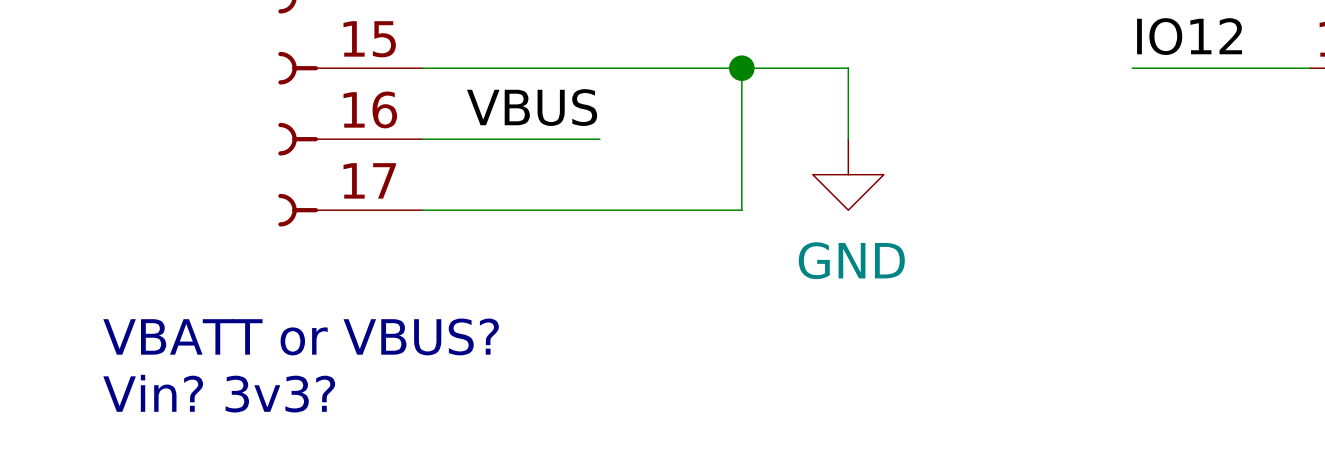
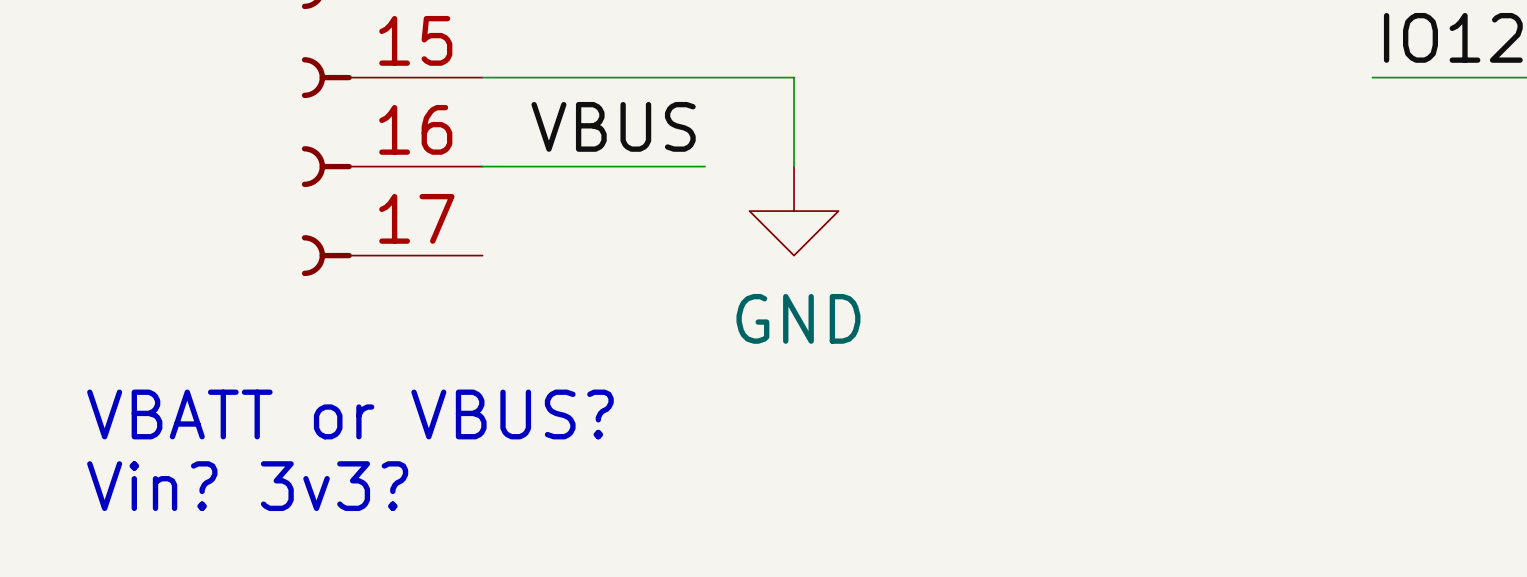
wire: (670, 68) (848, 68) (848, 139) -> (794, 77) (794, 166)
wire: (741, 68) (741, 210) (422, 210) -> none
junction: (741, 68) -> none
power symbol position: GND (848, 174) -> GND (794, 211)

